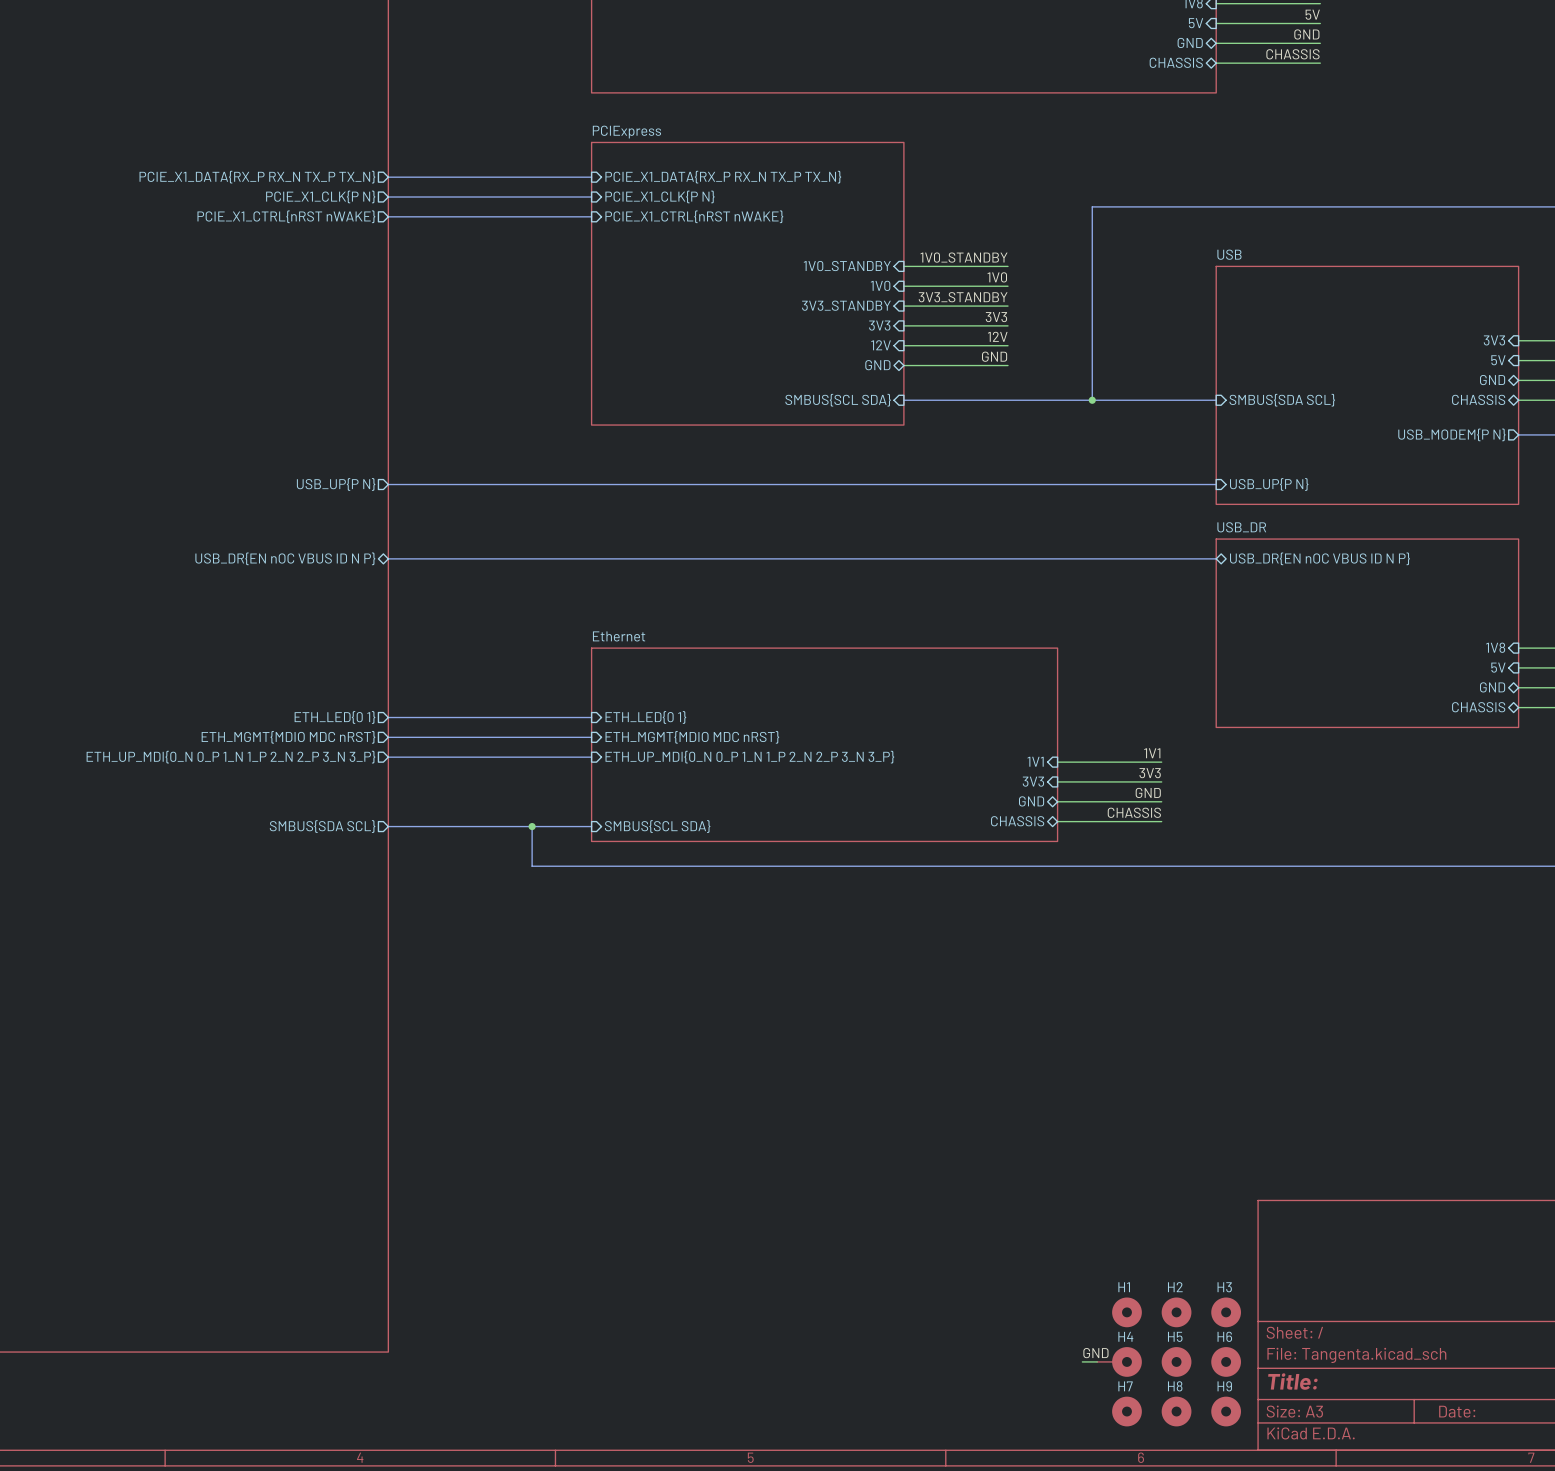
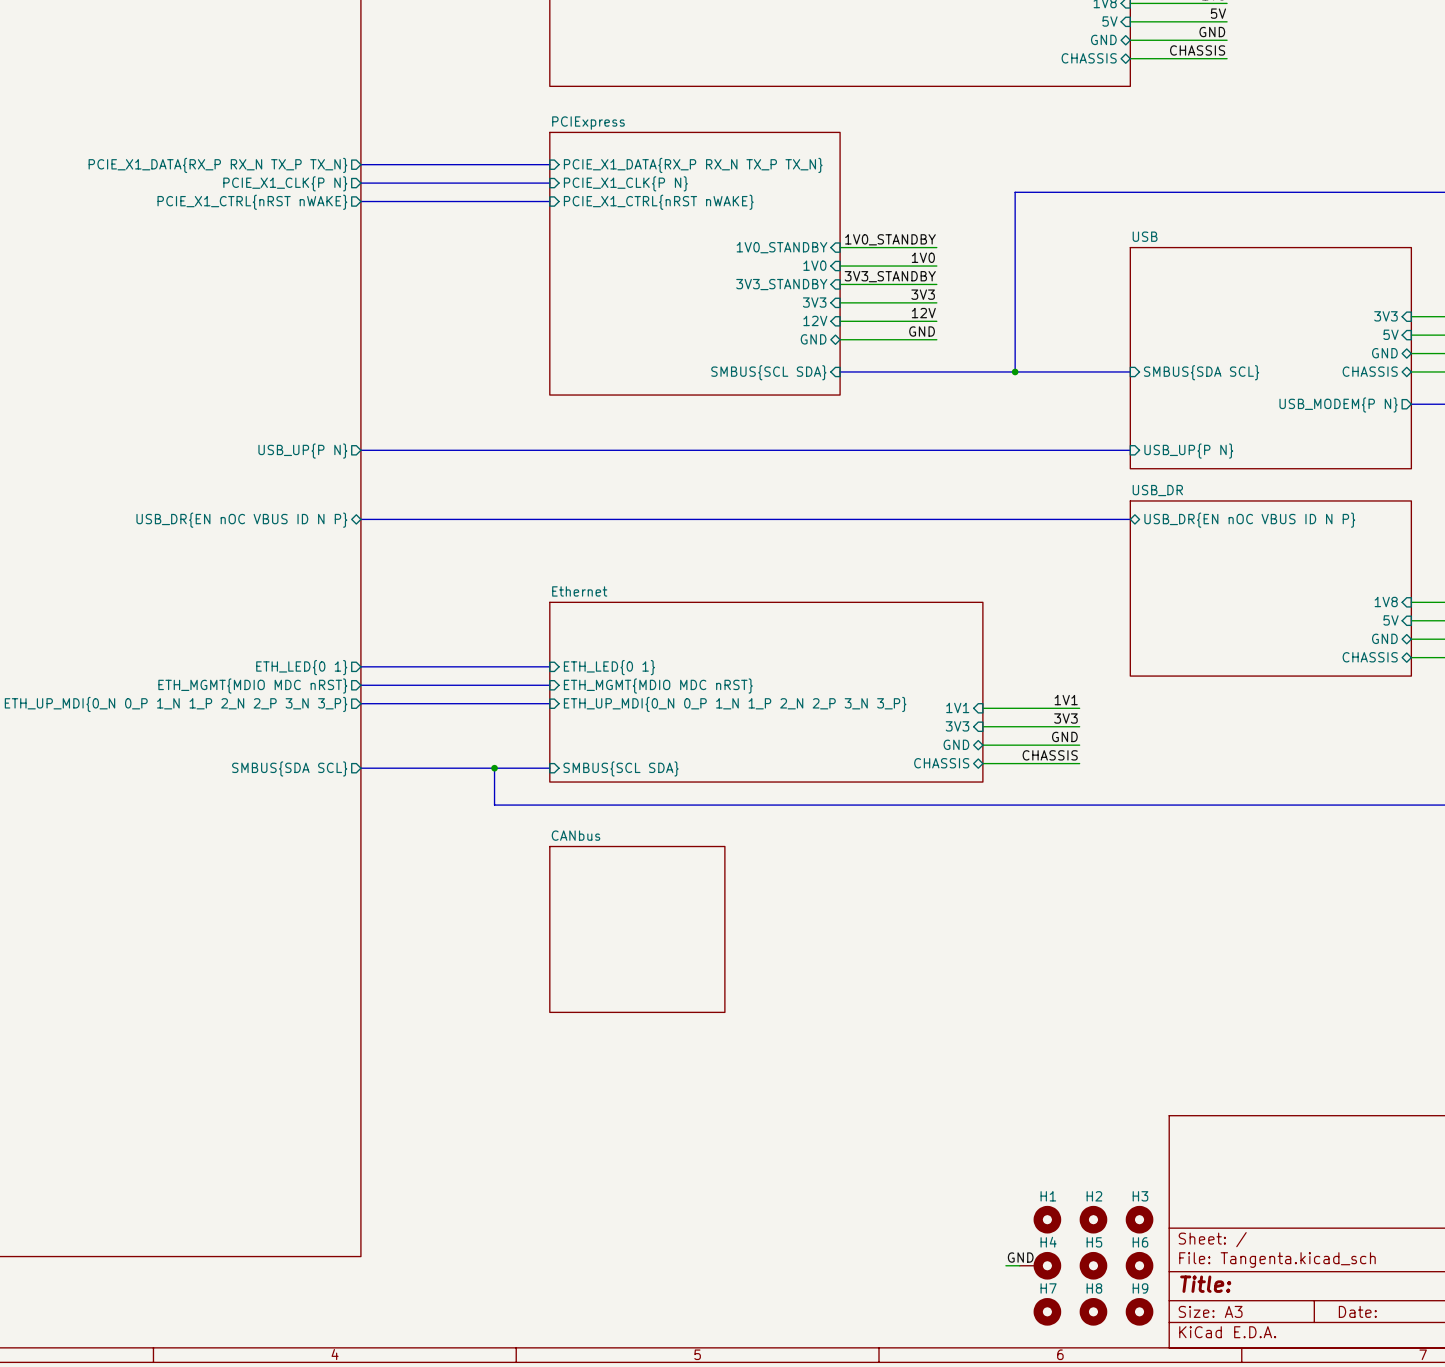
sheet CANbus: none -> (637, 929)

